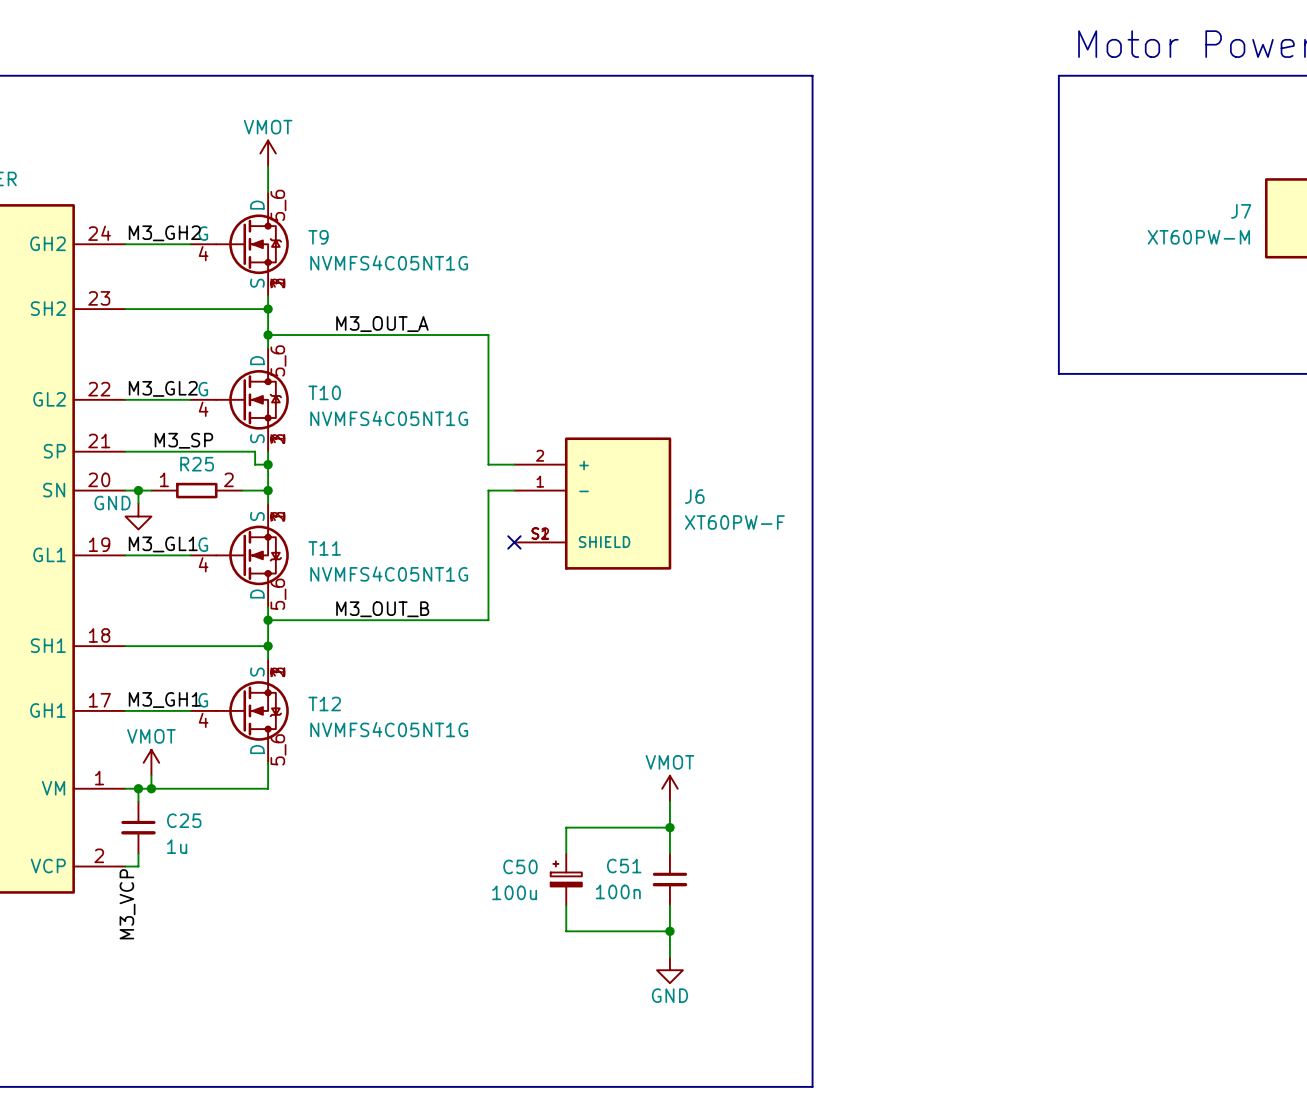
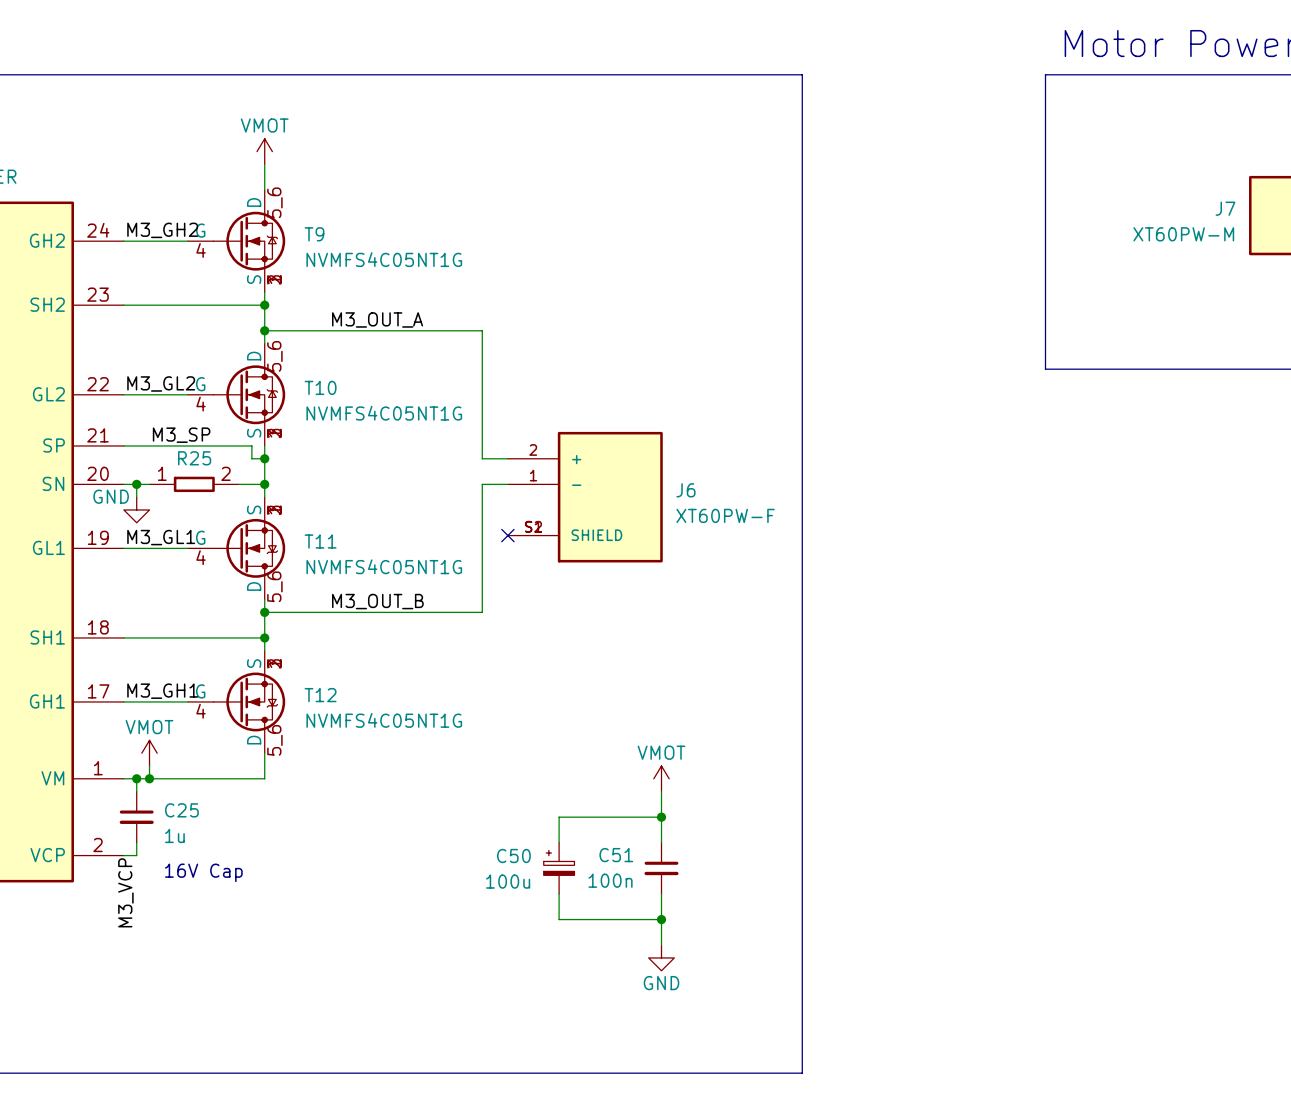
text: none -> 16V Cap (203, 872)

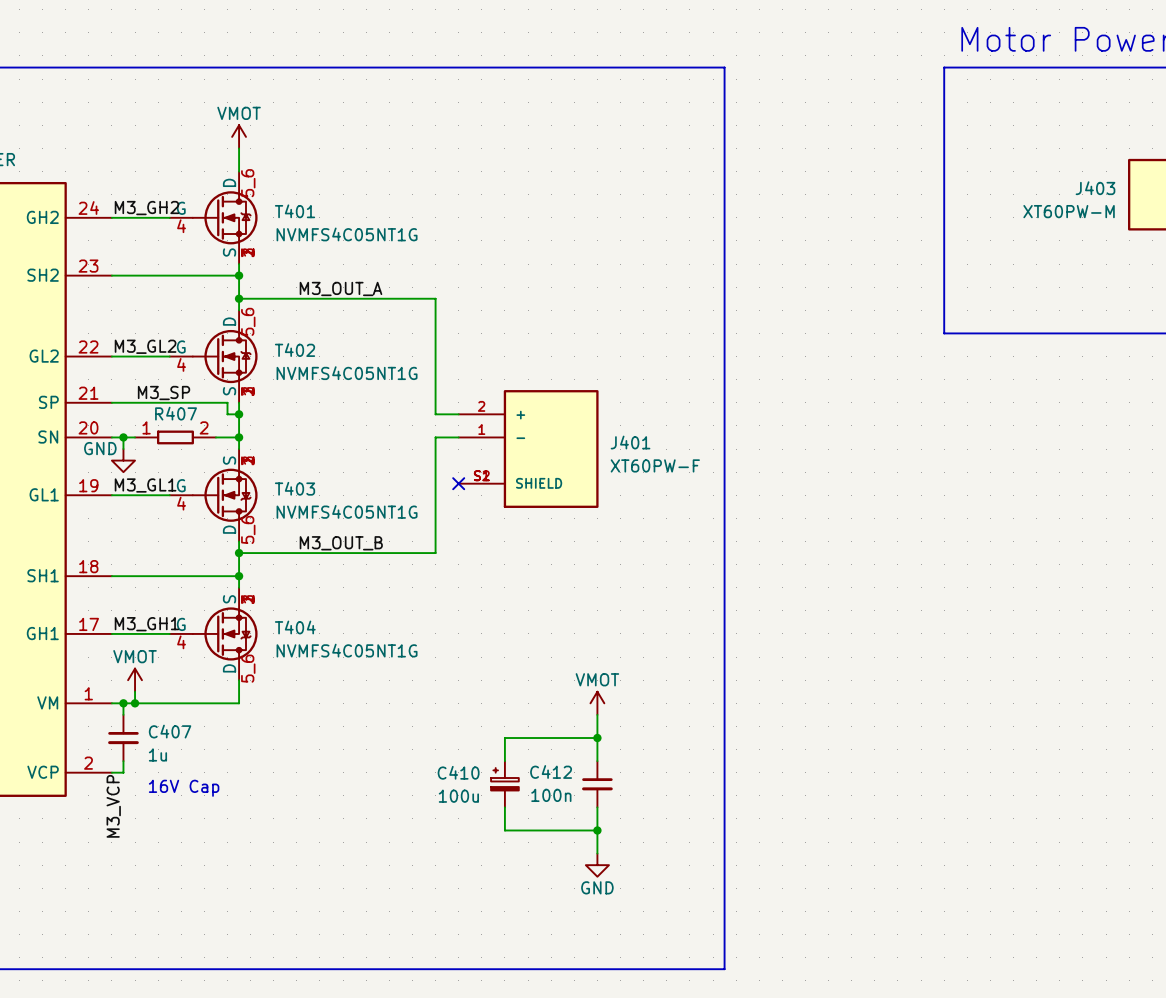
J7 name: J7 (1225, 208) -> J403 (1095, 188)
T9 name: T9 (314, 234) -> T401 (295, 211)
T10 name: T10 (320, 387) -> T402 (295, 350)
R25 name: R25 (194, 458) -> R407 (176, 413)
J6 name: J6 (685, 490) -> J401 (630, 442)
T11 name: T11 (320, 541) -> T403 (295, 488)
T12 name: T12 (320, 695) -> T404 (295, 627)
C25 name: C25 (181, 810) -> C407 (170, 731)
C50 name: C50 (513, 855) -> C410 (458, 772)
C51 name: C51 (616, 855) -> C412 (551, 771)

